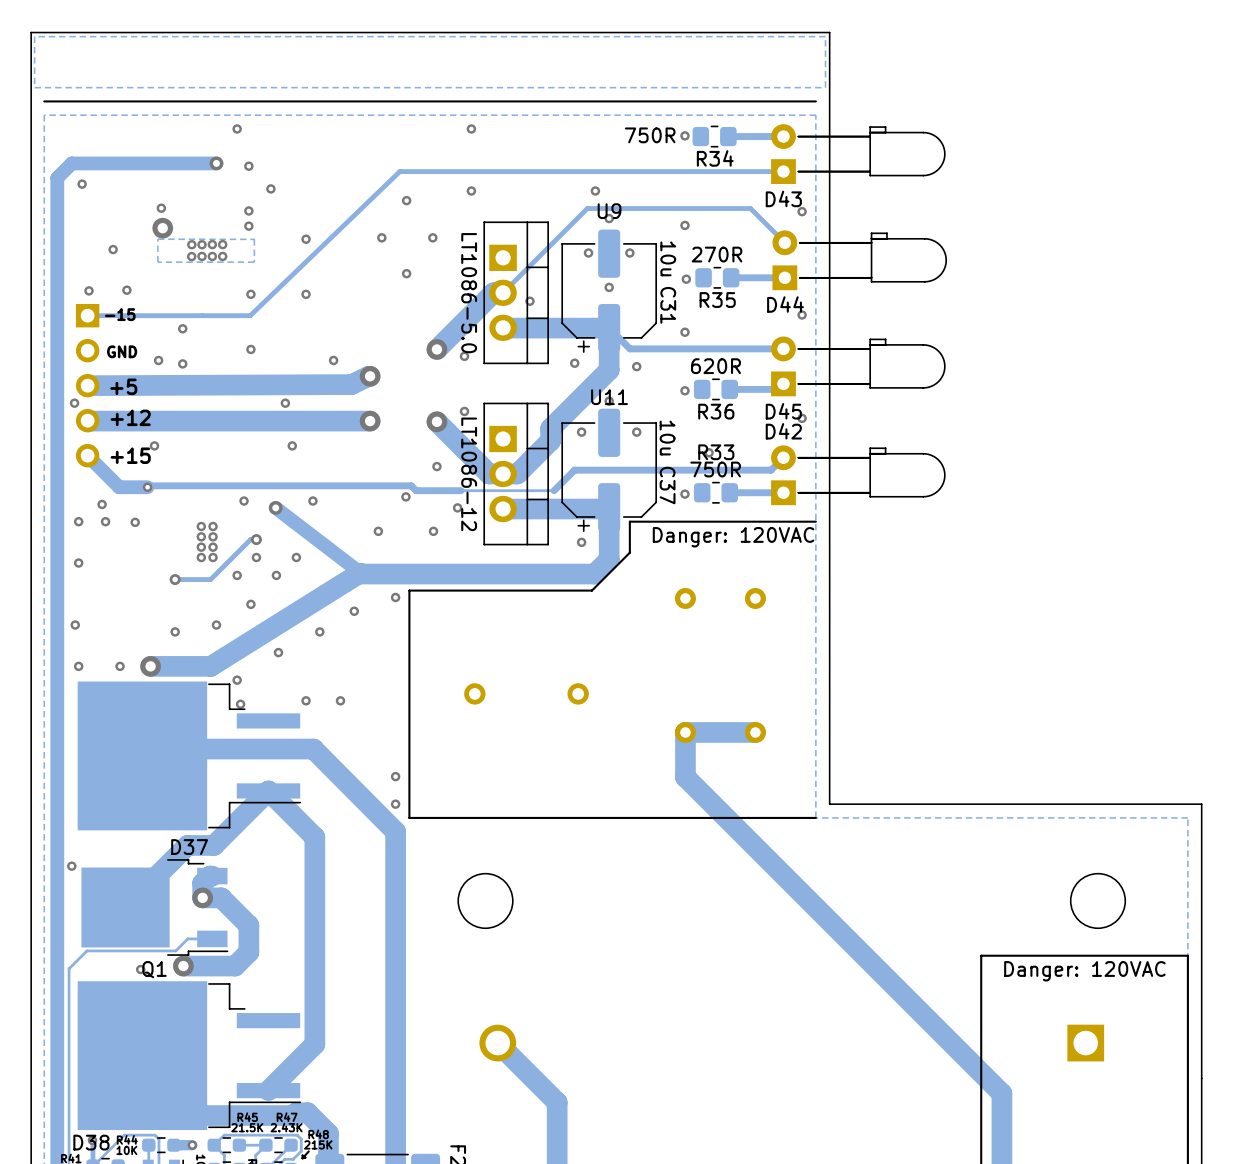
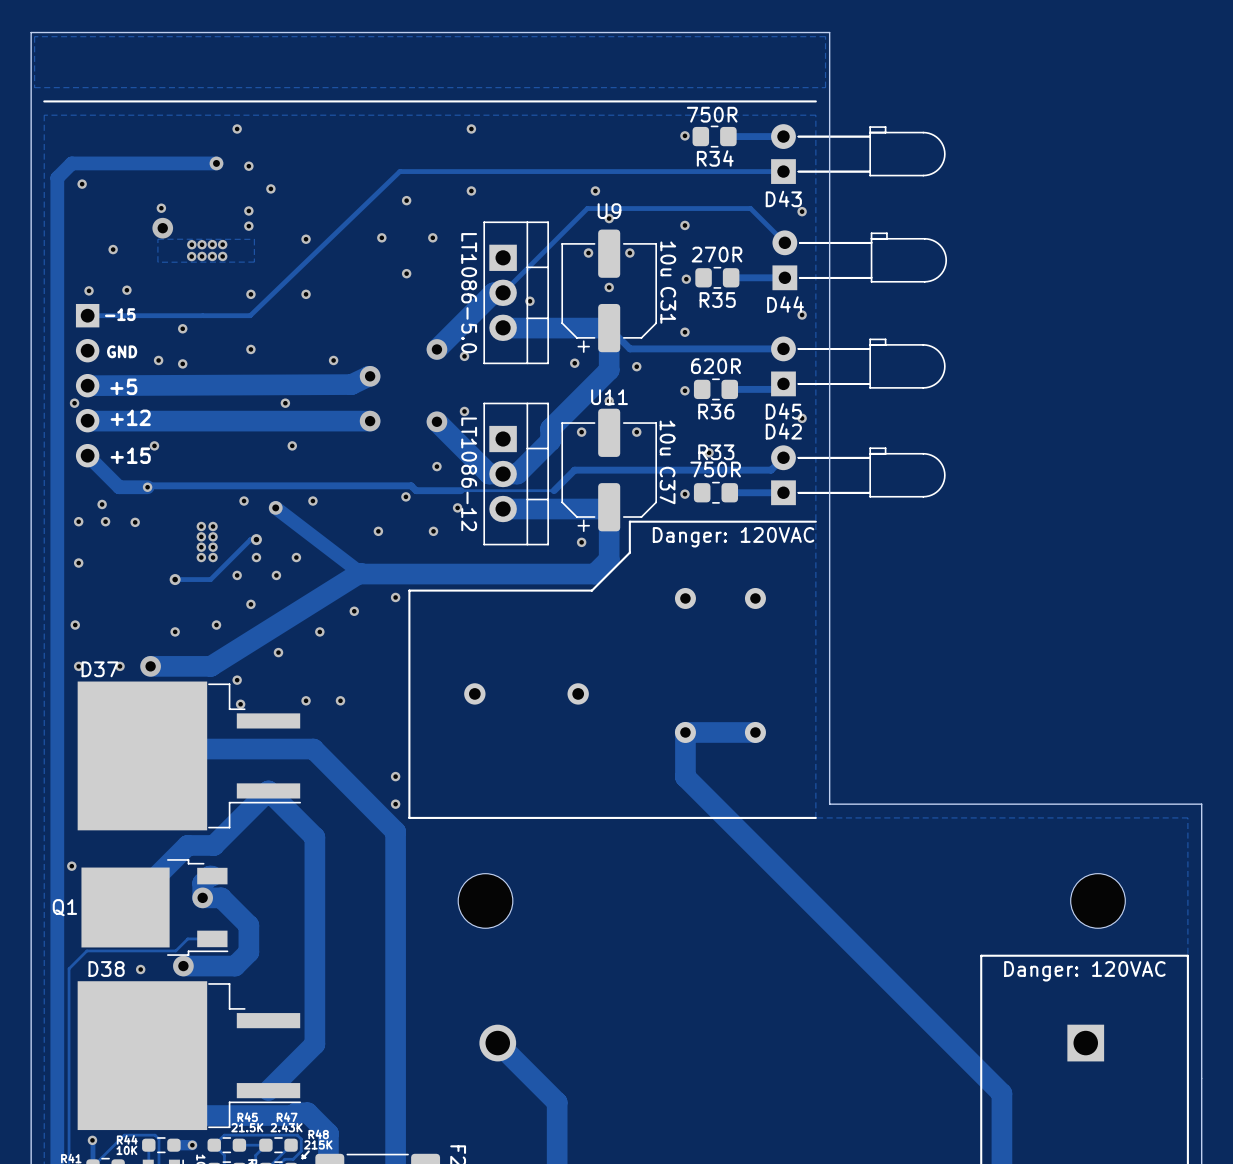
R34 value position: 750R (650, 135) -> 750R (712, 114)
D37 name position: D37 (189, 847) -> D37 (100, 669)
Q1 name position: Q1 (154, 969) -> Q1 (64, 907)
D38 name position: D38 (91, 1142) -> D38 (106, 968)

